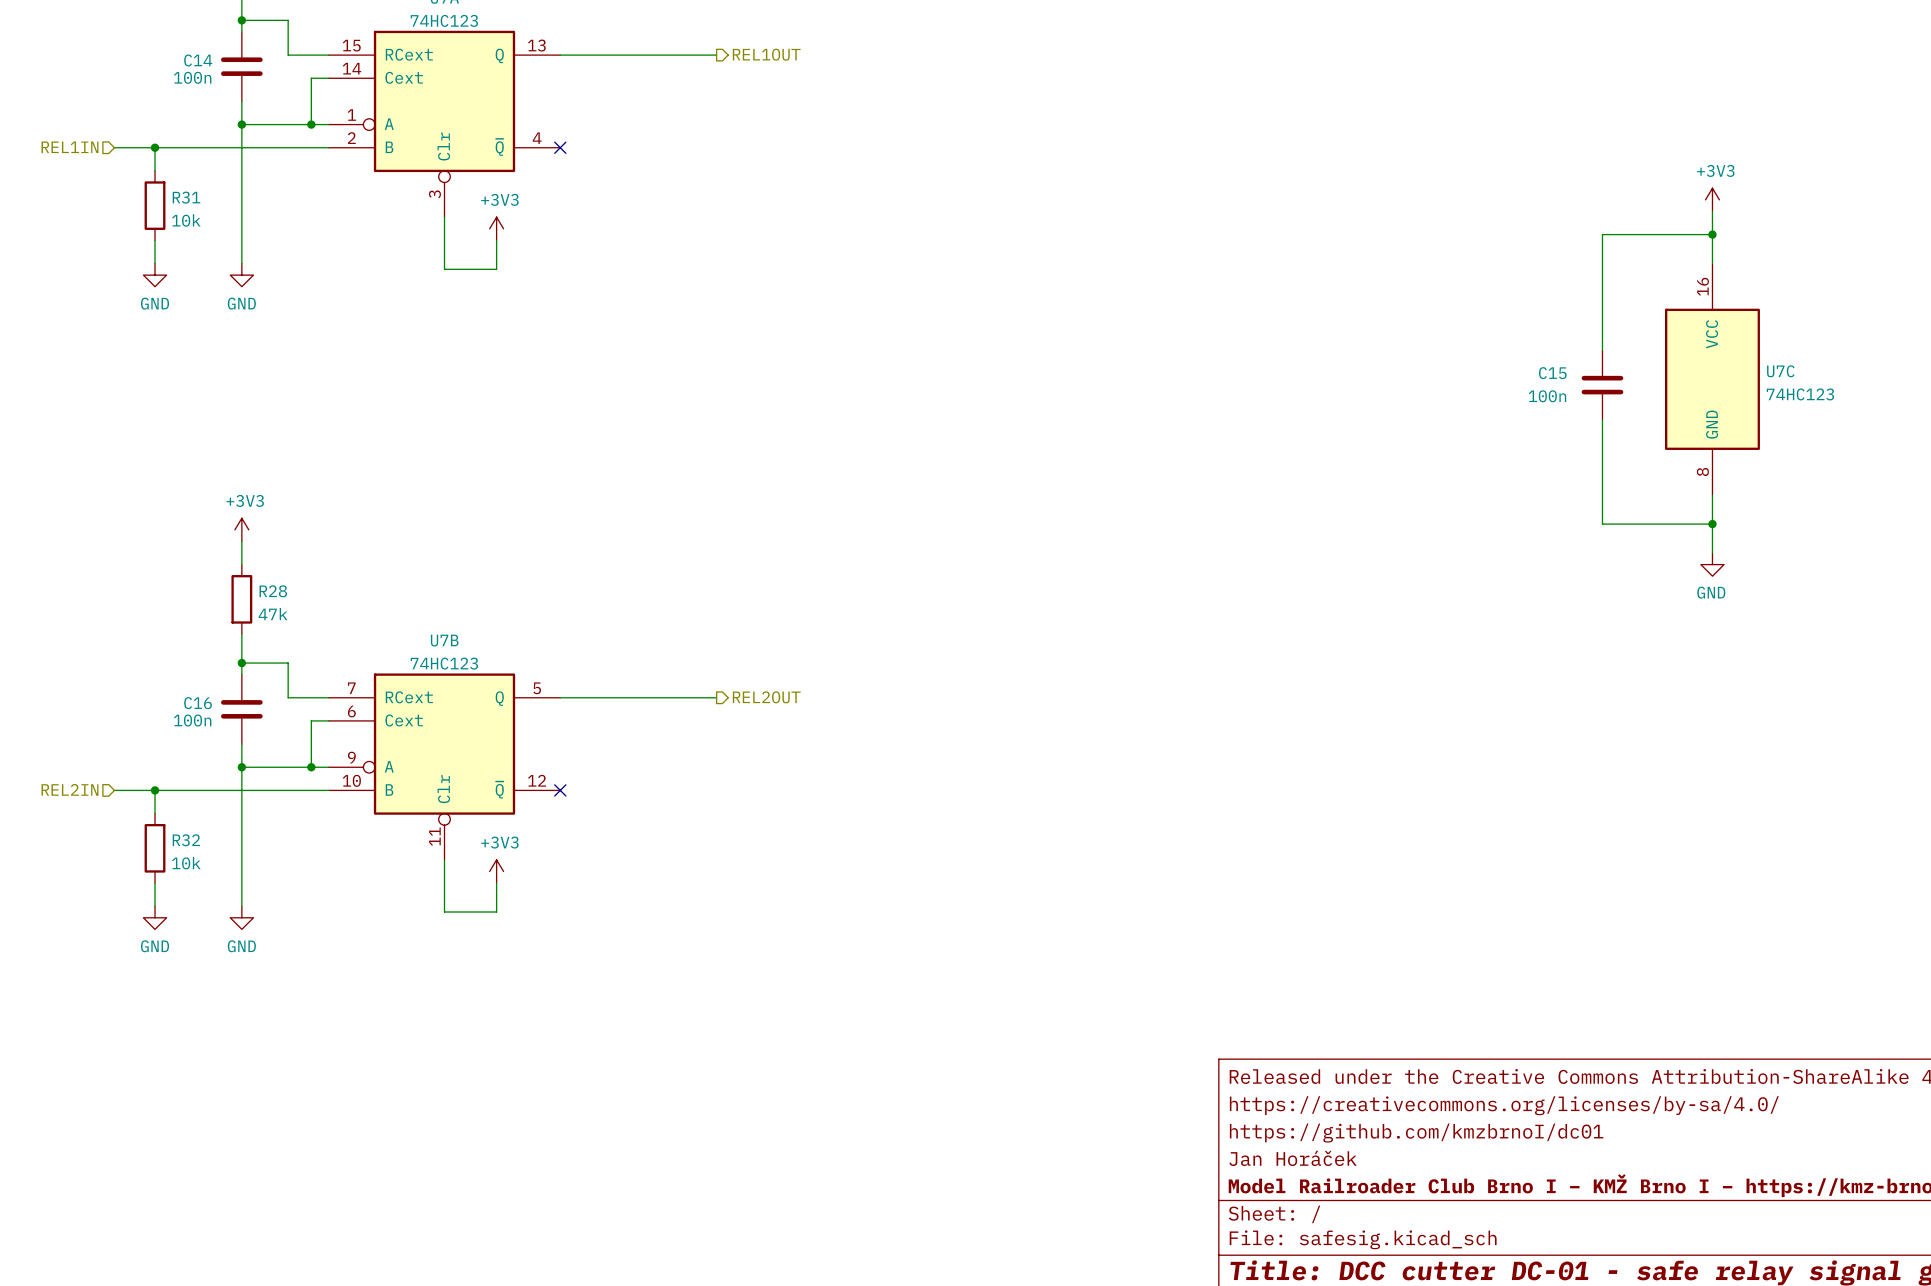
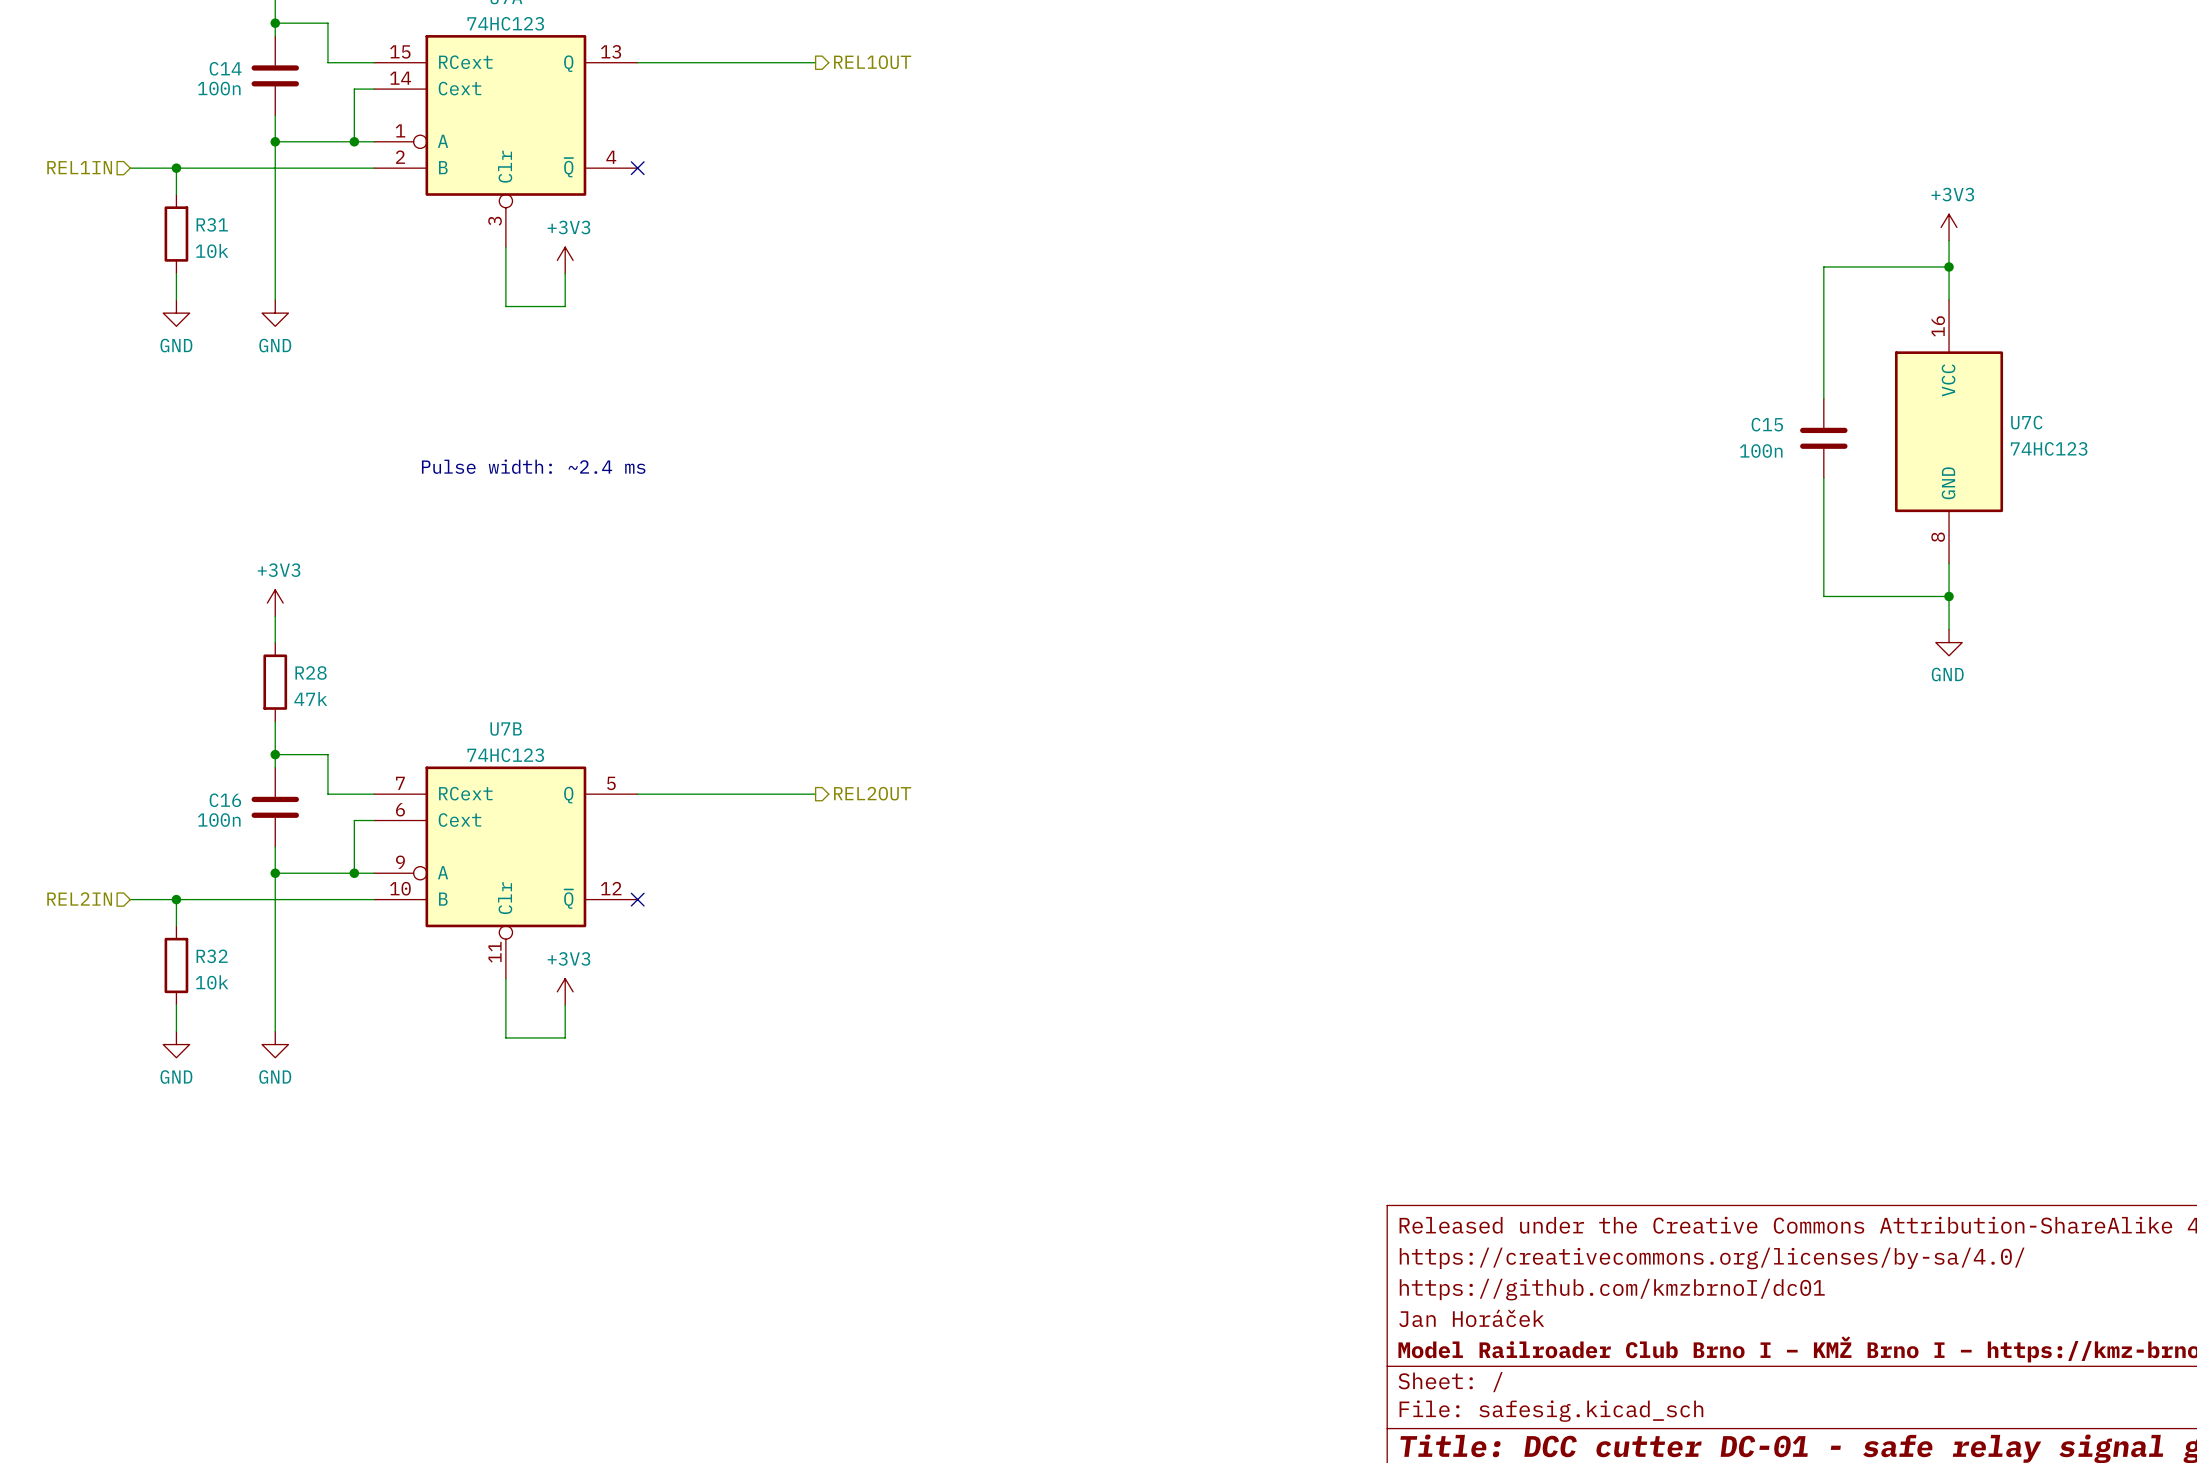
text: none -> Pulse width: ~2.4 ms (533, 466)

